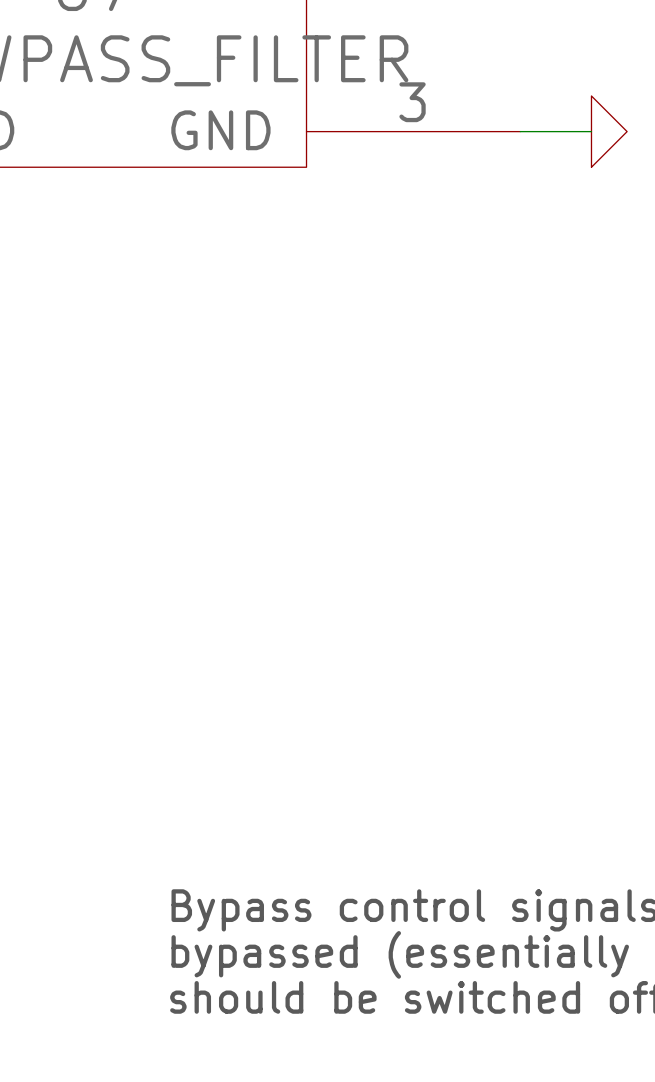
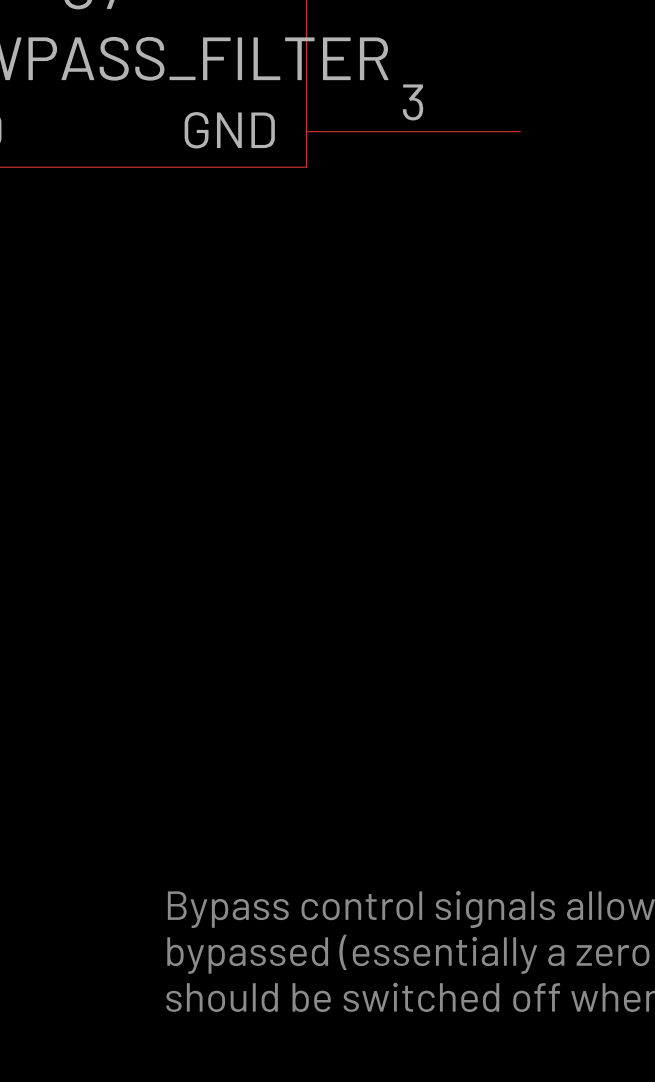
wire: (520, 131) (591, 131) -> none
power symbol: (609, 131) -> none

